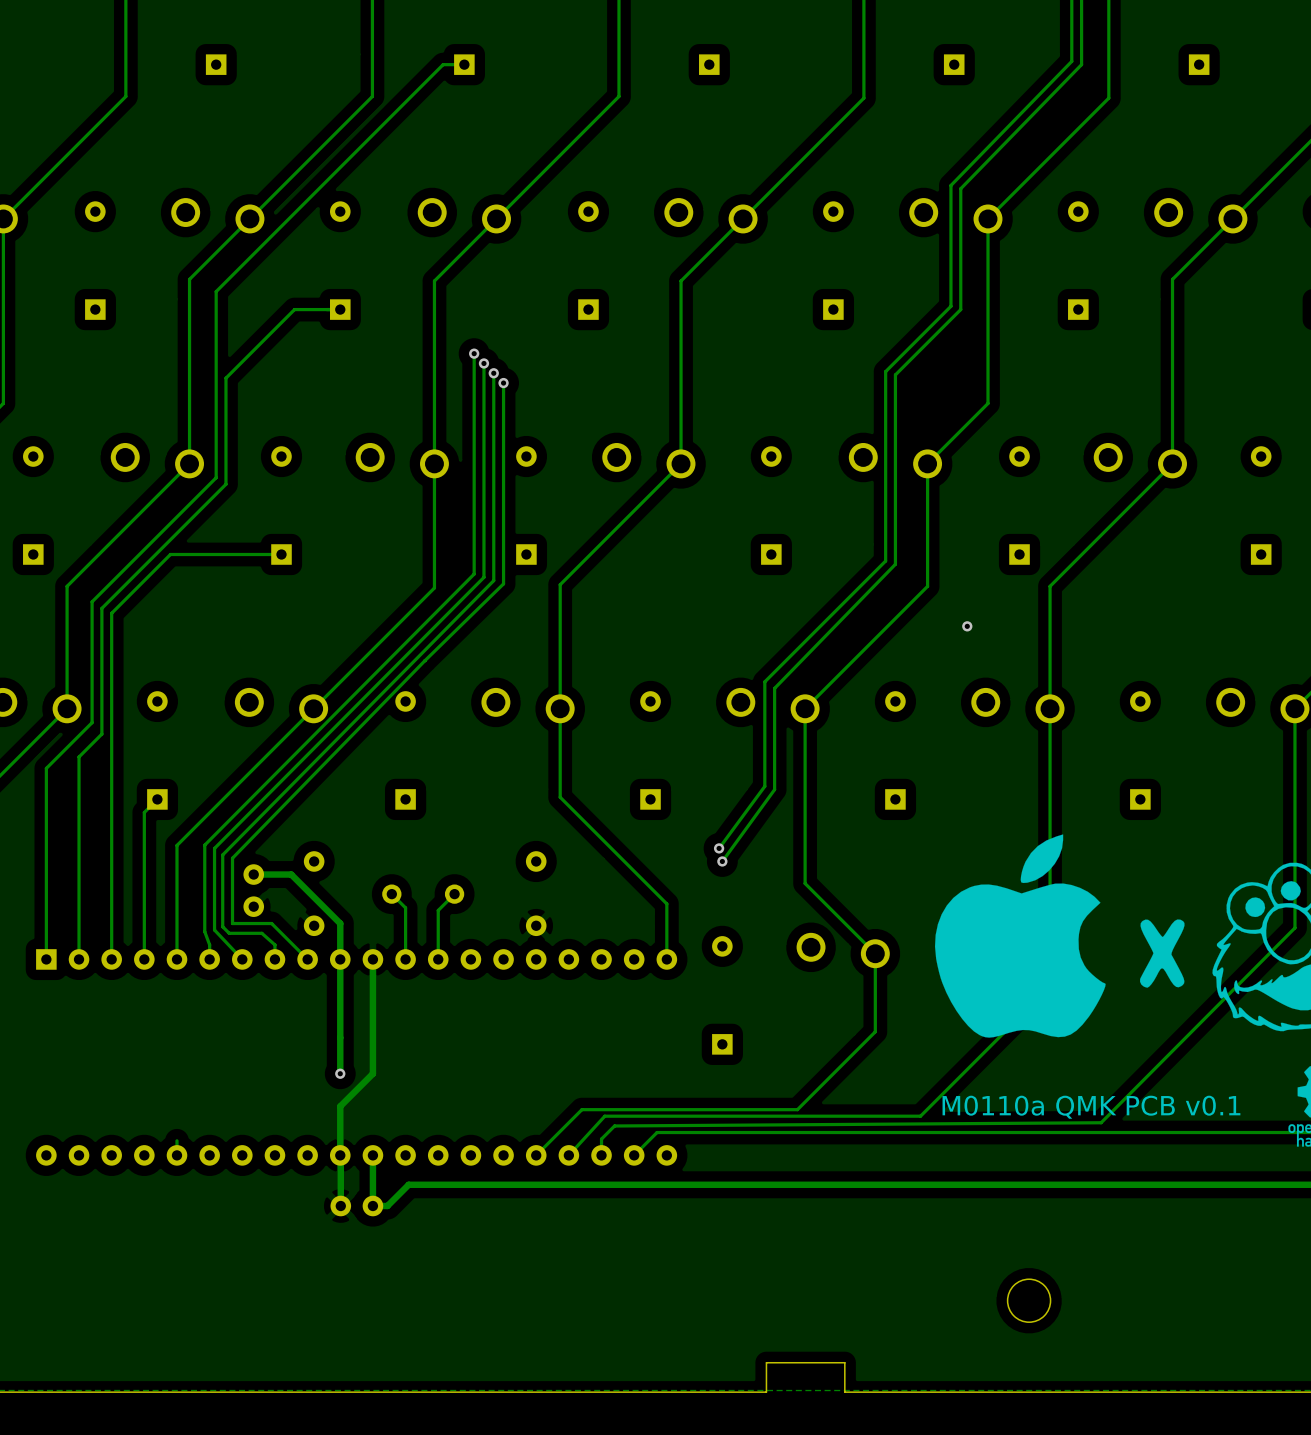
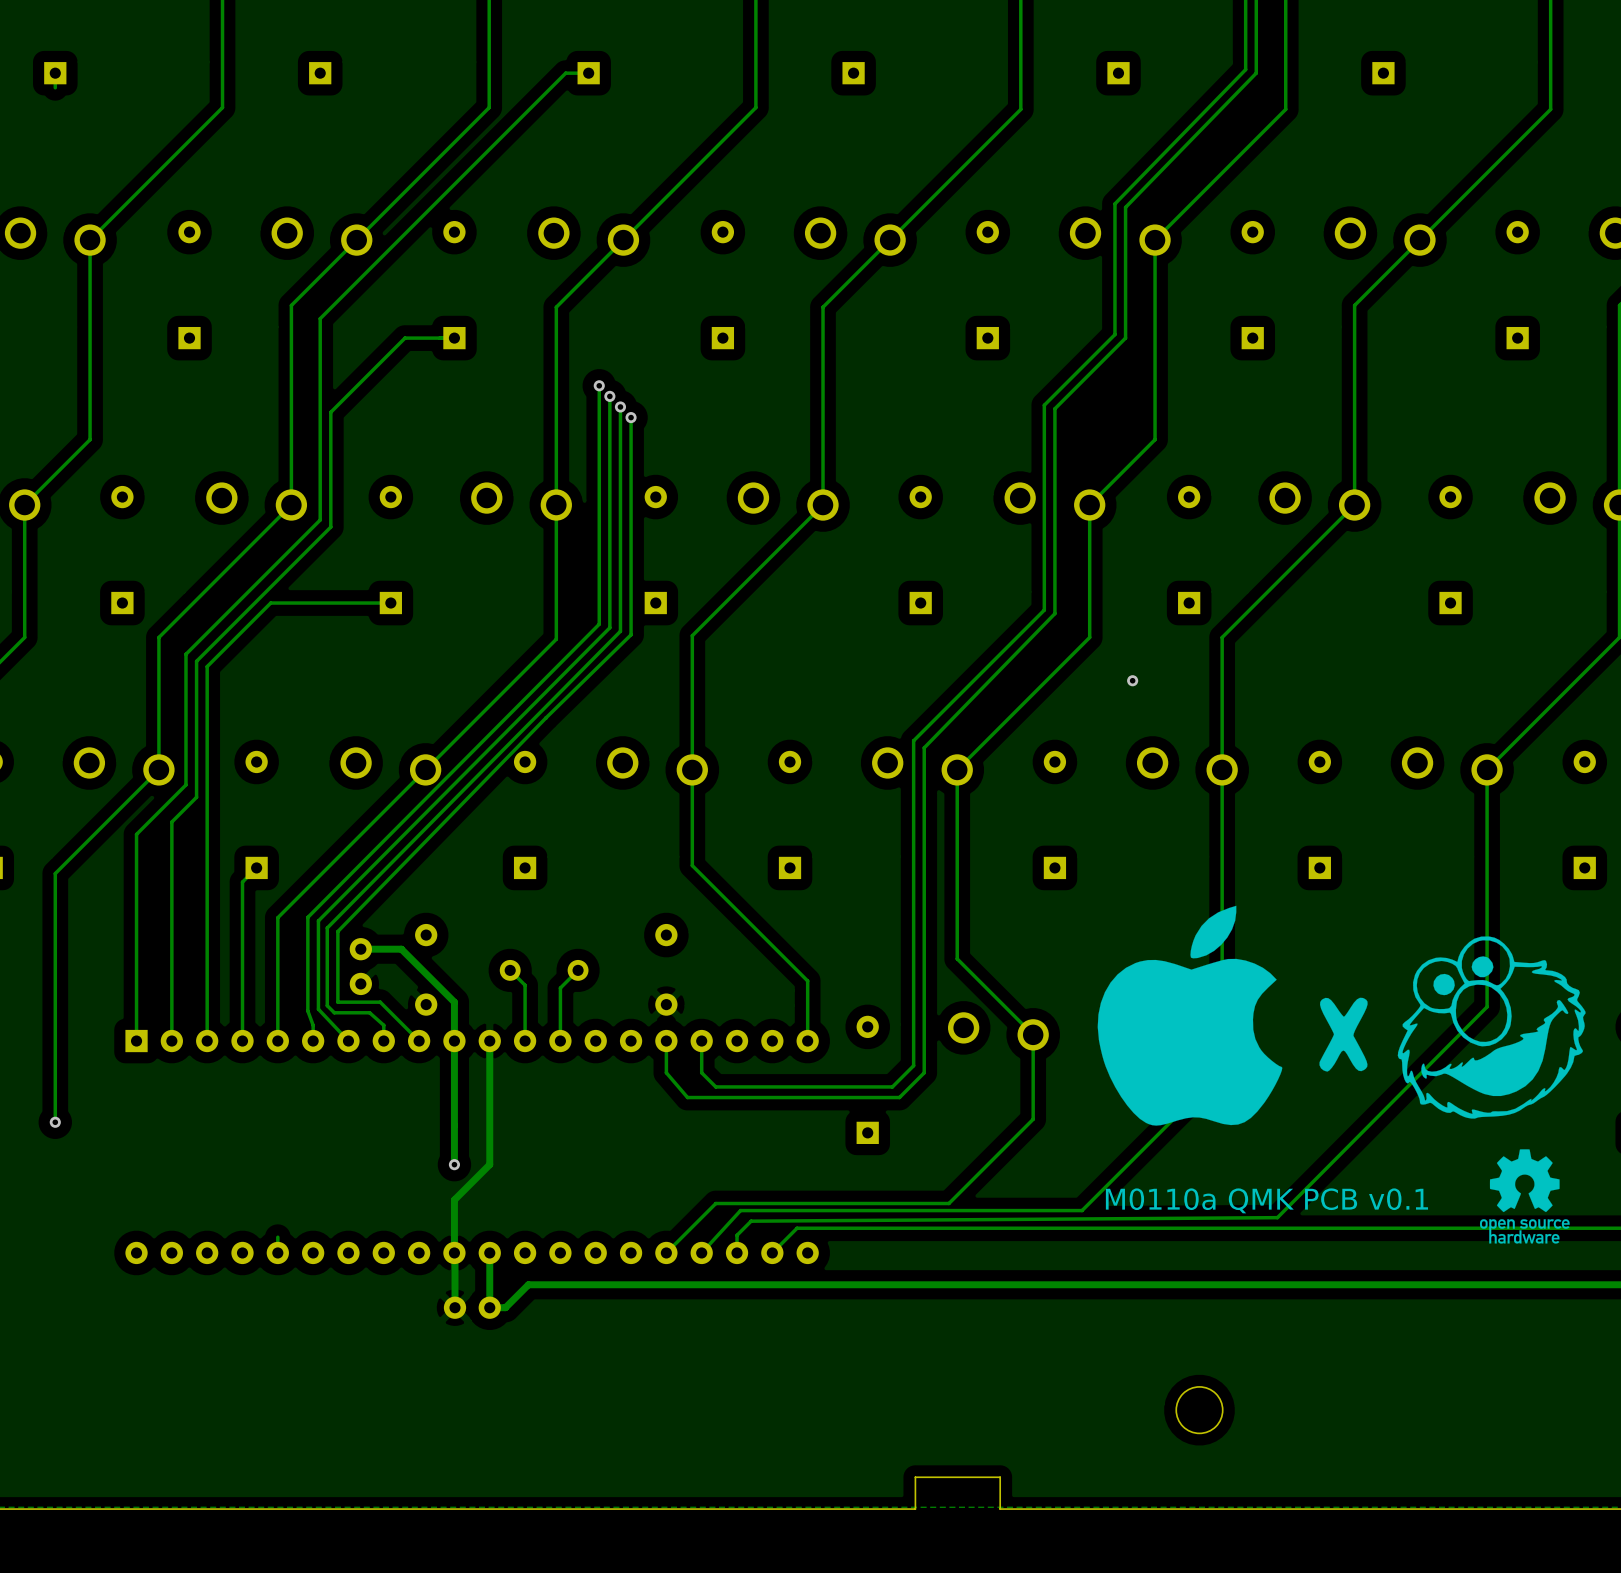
track: (764, 786) (719, 848) -> (913, 853) (913, 1065) (892, 1086) (715, 1086) (701, 1072) (701, 1041)
track: (774, 789) (722, 861) -> (924, 857) (924, 1072) (899, 1097) (687, 1097) (666, 1072) (666, 1041)
via: (719, 848) -> none
via: (722, 861) -> none

